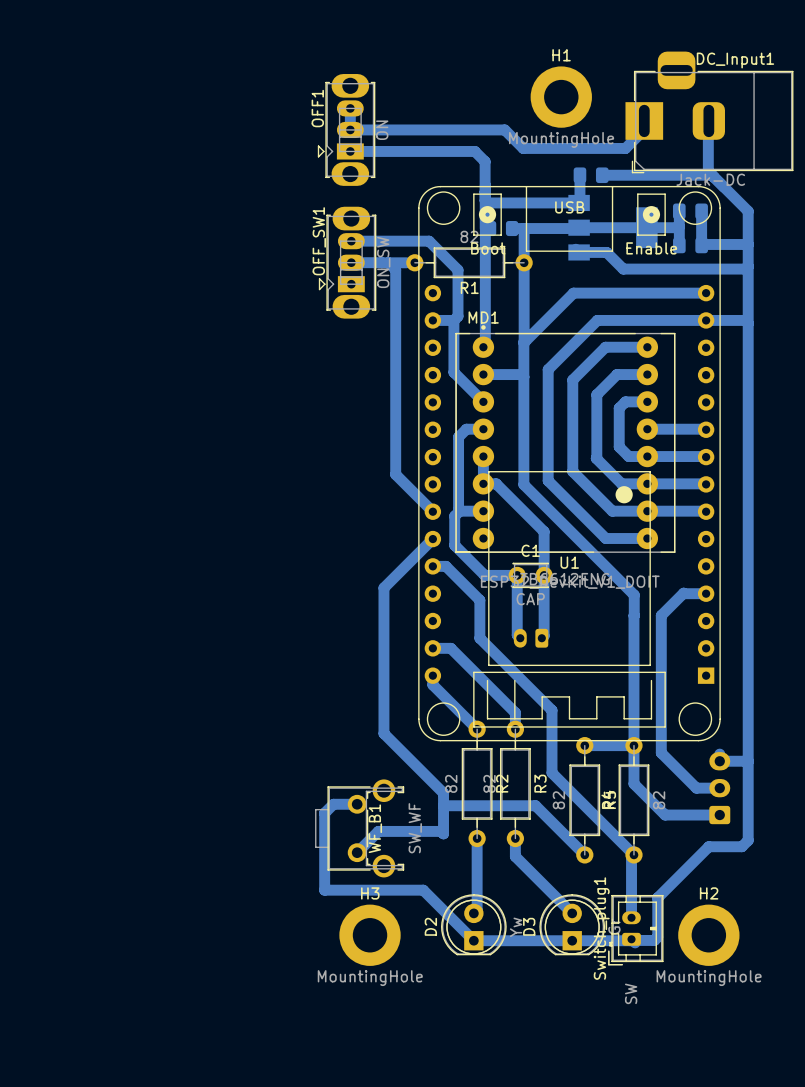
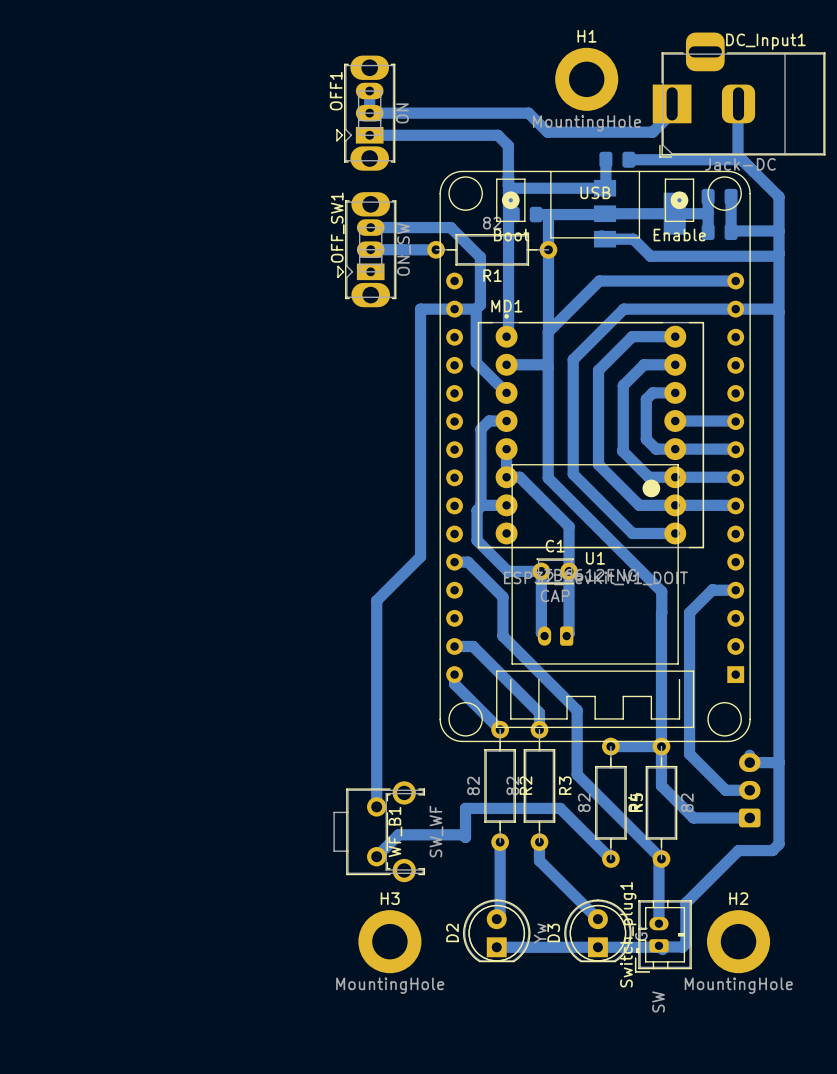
bottom track: (388, 262) (395, 269) (395, 474) (432, 511) -> none
bottom track: (432, 539) (383, 587) (383, 733) (443, 793) (443, 805) -> none
bottom track: (357, 804) (333, 804) (324, 813) (324, 890) (423, 890) (473, 940) -> (376, 806) (376, 600) (420, 556) (420, 309) (454, 309)

